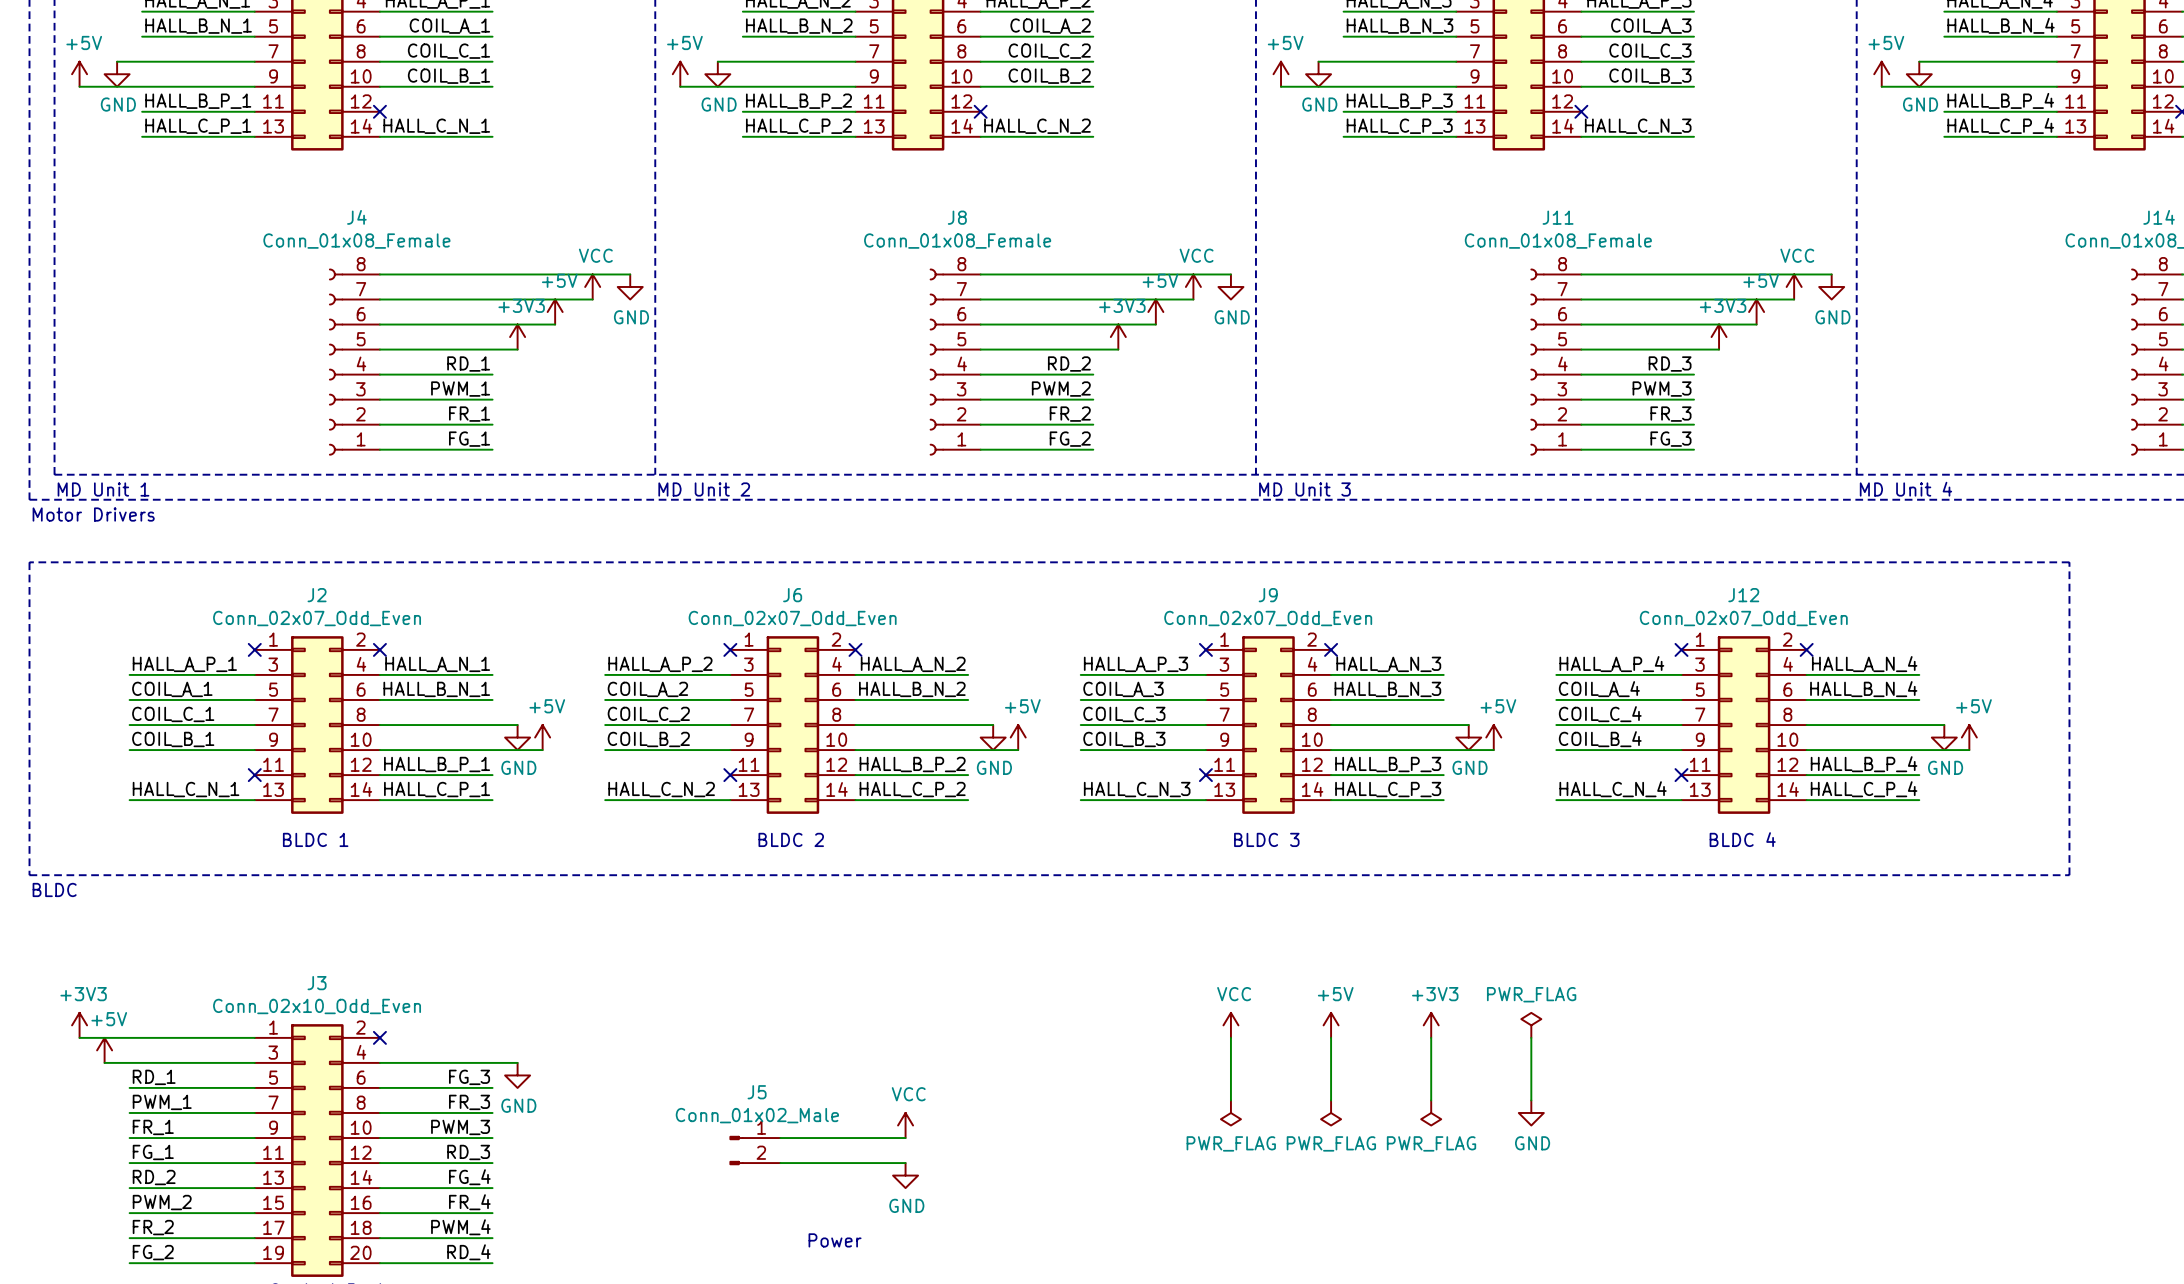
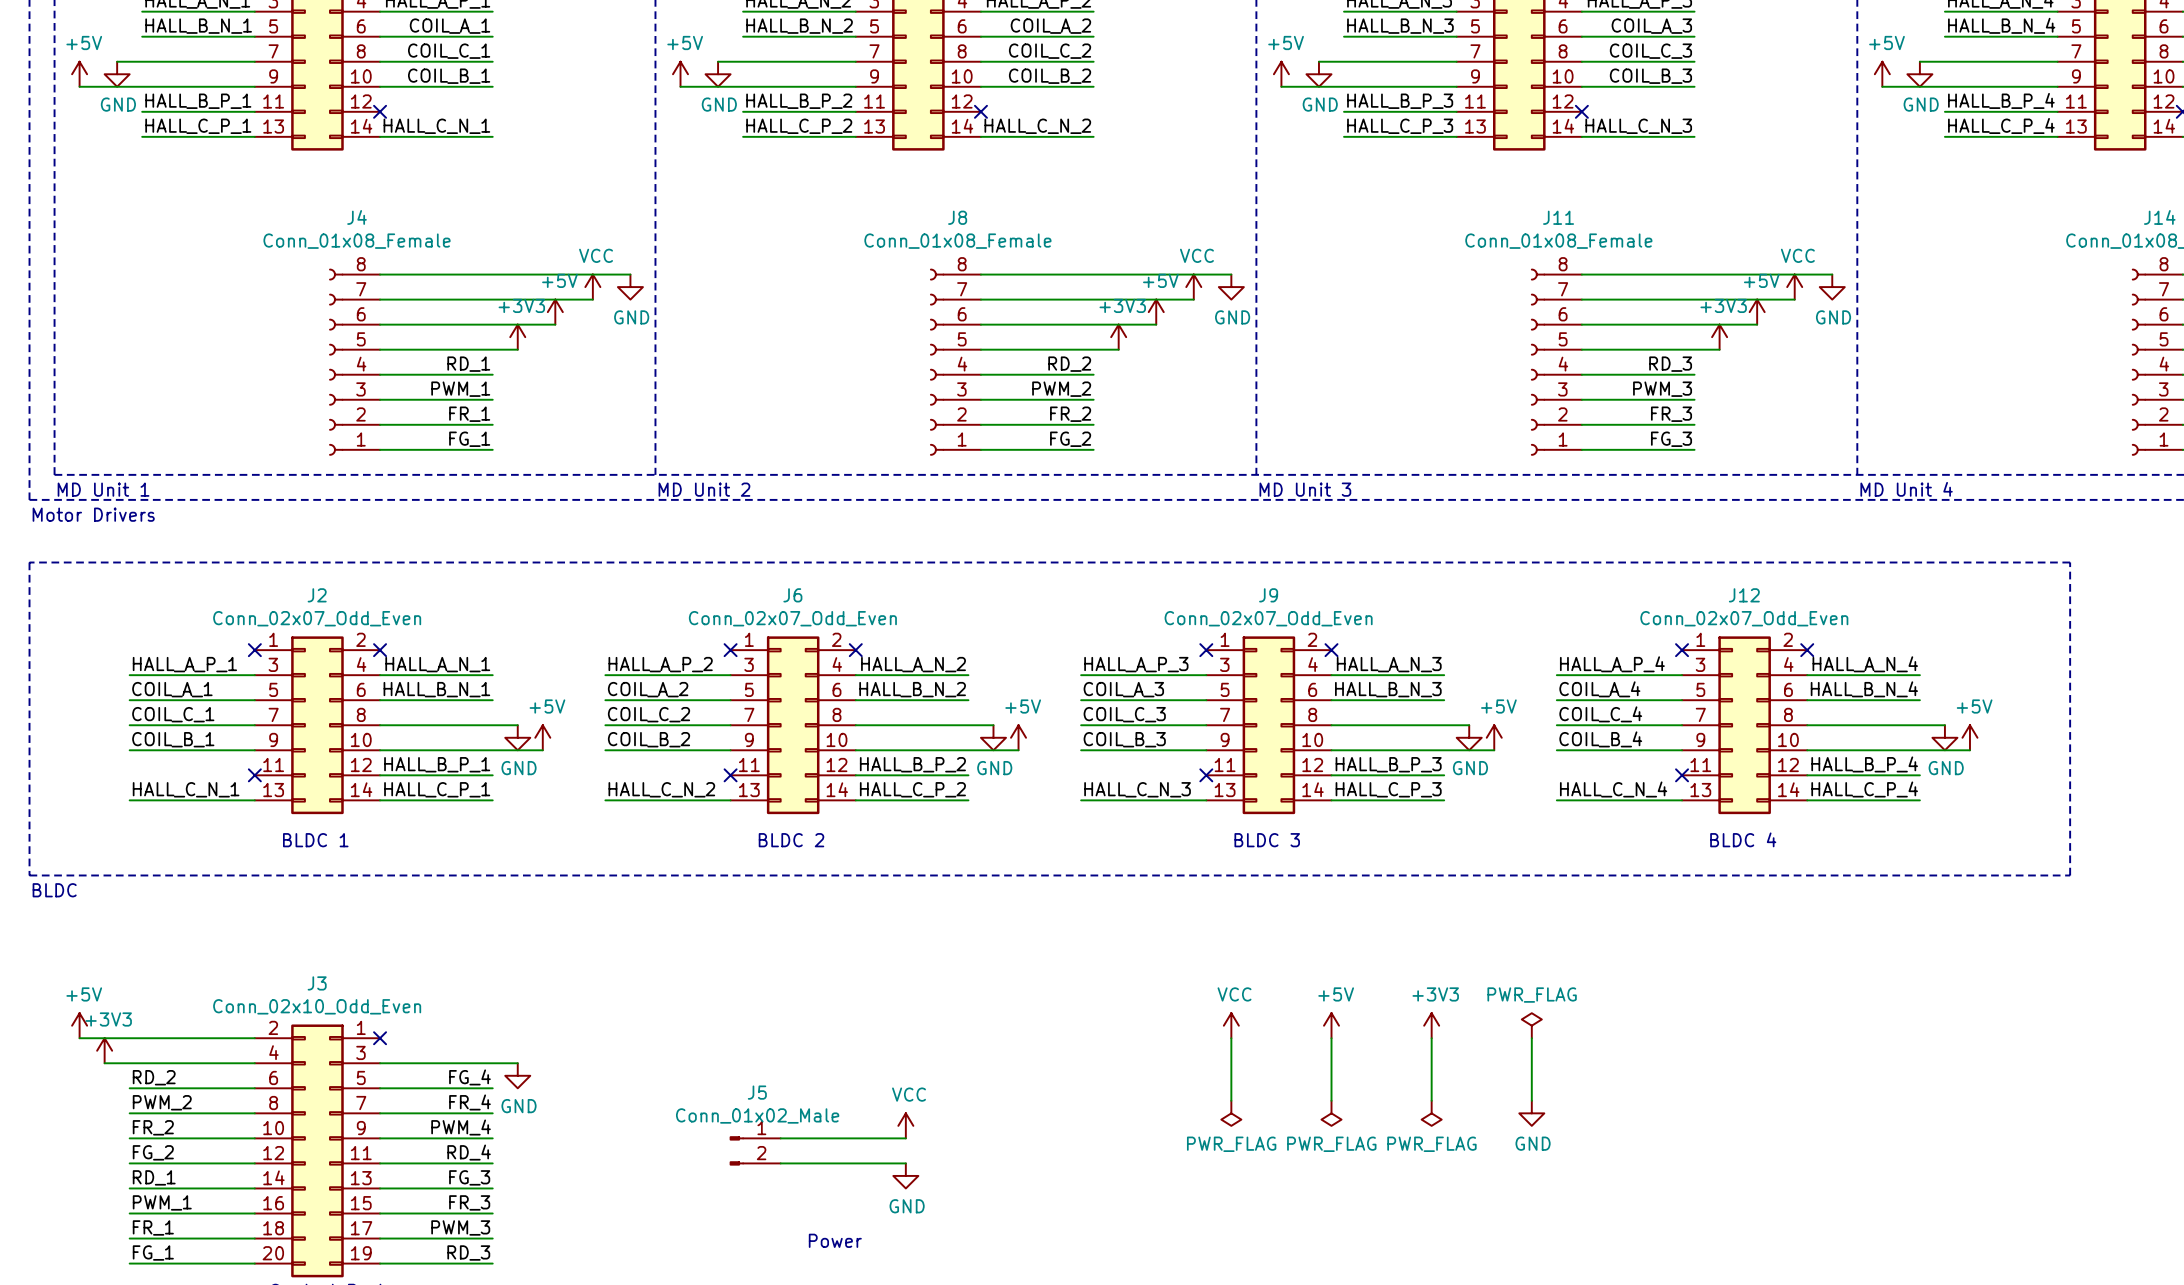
power symbol: +3V3 (79, 1025) -> +5V (79, 1025)
power symbol: +5V (104, 1050) -> +3V3 (104, 1050)
label: RD_1 (154, 1077) -> RD_2 (154, 1077)
label: FG_3 (469, 1077) -> FG_4 (469, 1077)
label: PWM_1 (162, 1102) -> PWM_2 (162, 1102)
label: FR_3 (469, 1102) -> FR_4 (469, 1102)
label: FR_1 (153, 1127) -> FR_2 (153, 1127)
label: PWM_3 (460, 1127) -> PWM_4 (461, 1127)
J3 flip: as is (317, 1150) -> left-right (317, 1150)
label: FG_1 (153, 1152) -> FG_2 (153, 1152)
label: RD_3 (468, 1152) -> RD_4 (469, 1152)
label: RD_2 (154, 1177) -> RD_1 (154, 1177)
label: FG_4 (469, 1177) -> FG_3 (469, 1177)
label: PWM_2 (162, 1202) -> PWM_1 (162, 1202)
label: FR_4 (469, 1202) -> FR_3 (469, 1202)
label: FR_2 (153, 1227) -> FR_1 (153, 1227)
label: PWM_4 (460, 1227) -> PWM_3 (460, 1227)
label: FG_2 (153, 1252) -> FG_1 (153, 1253)
label: RD_4 (468, 1252) -> RD_3 (468, 1253)

